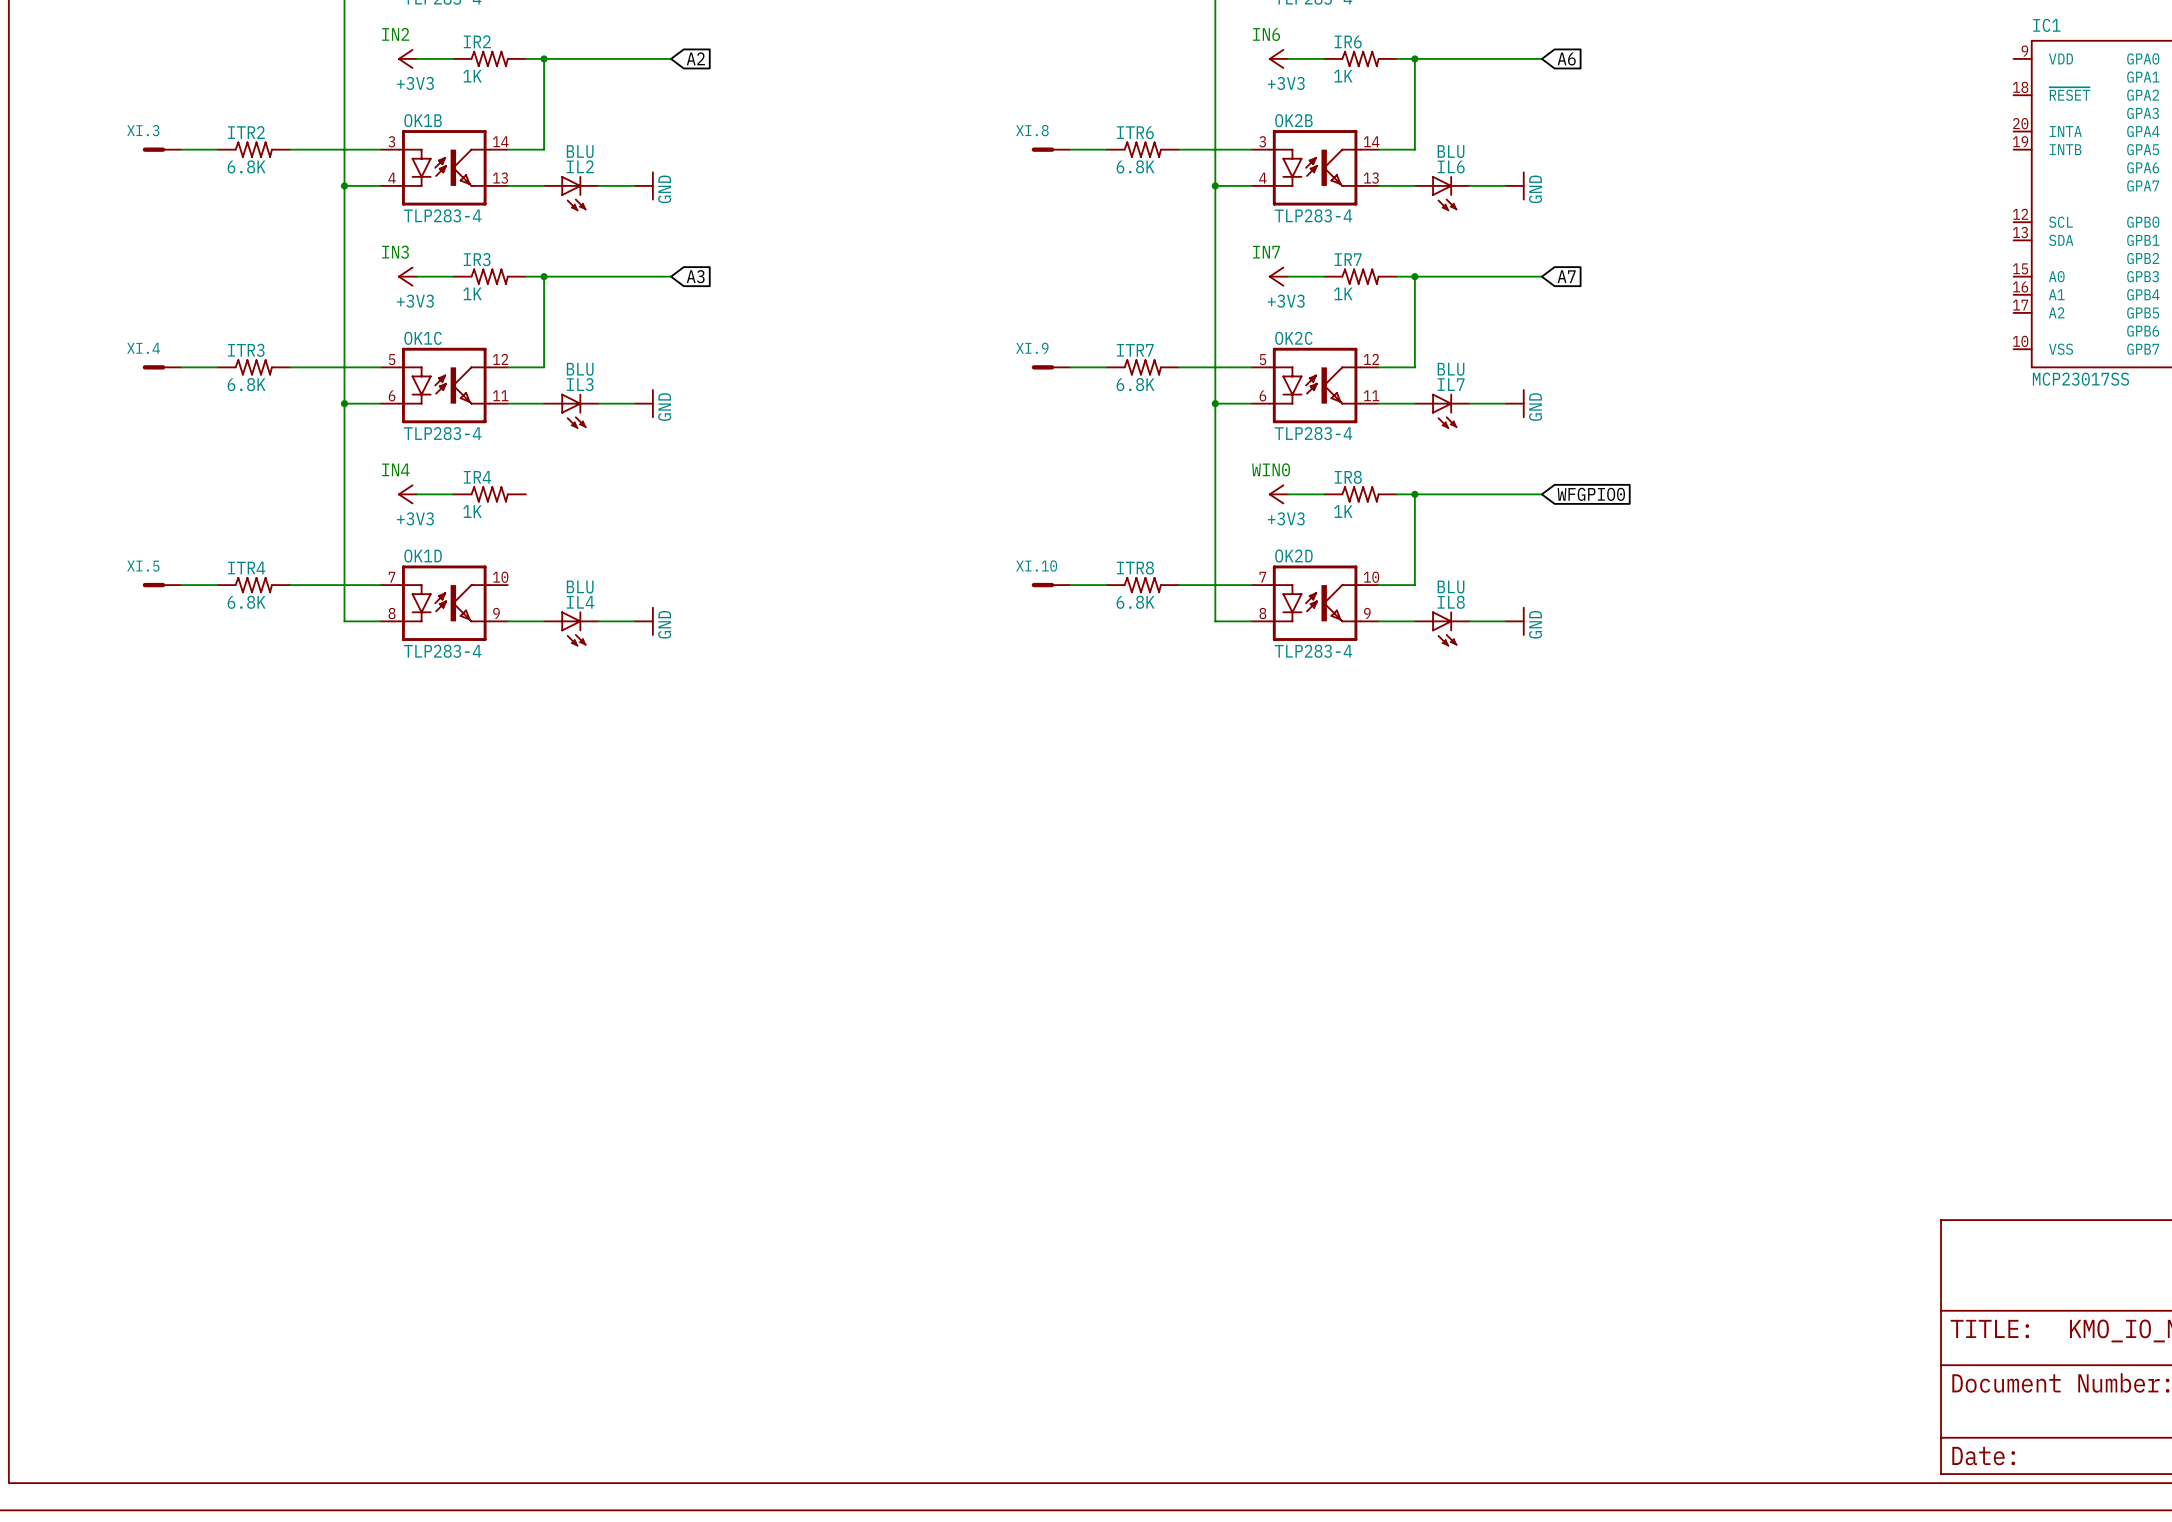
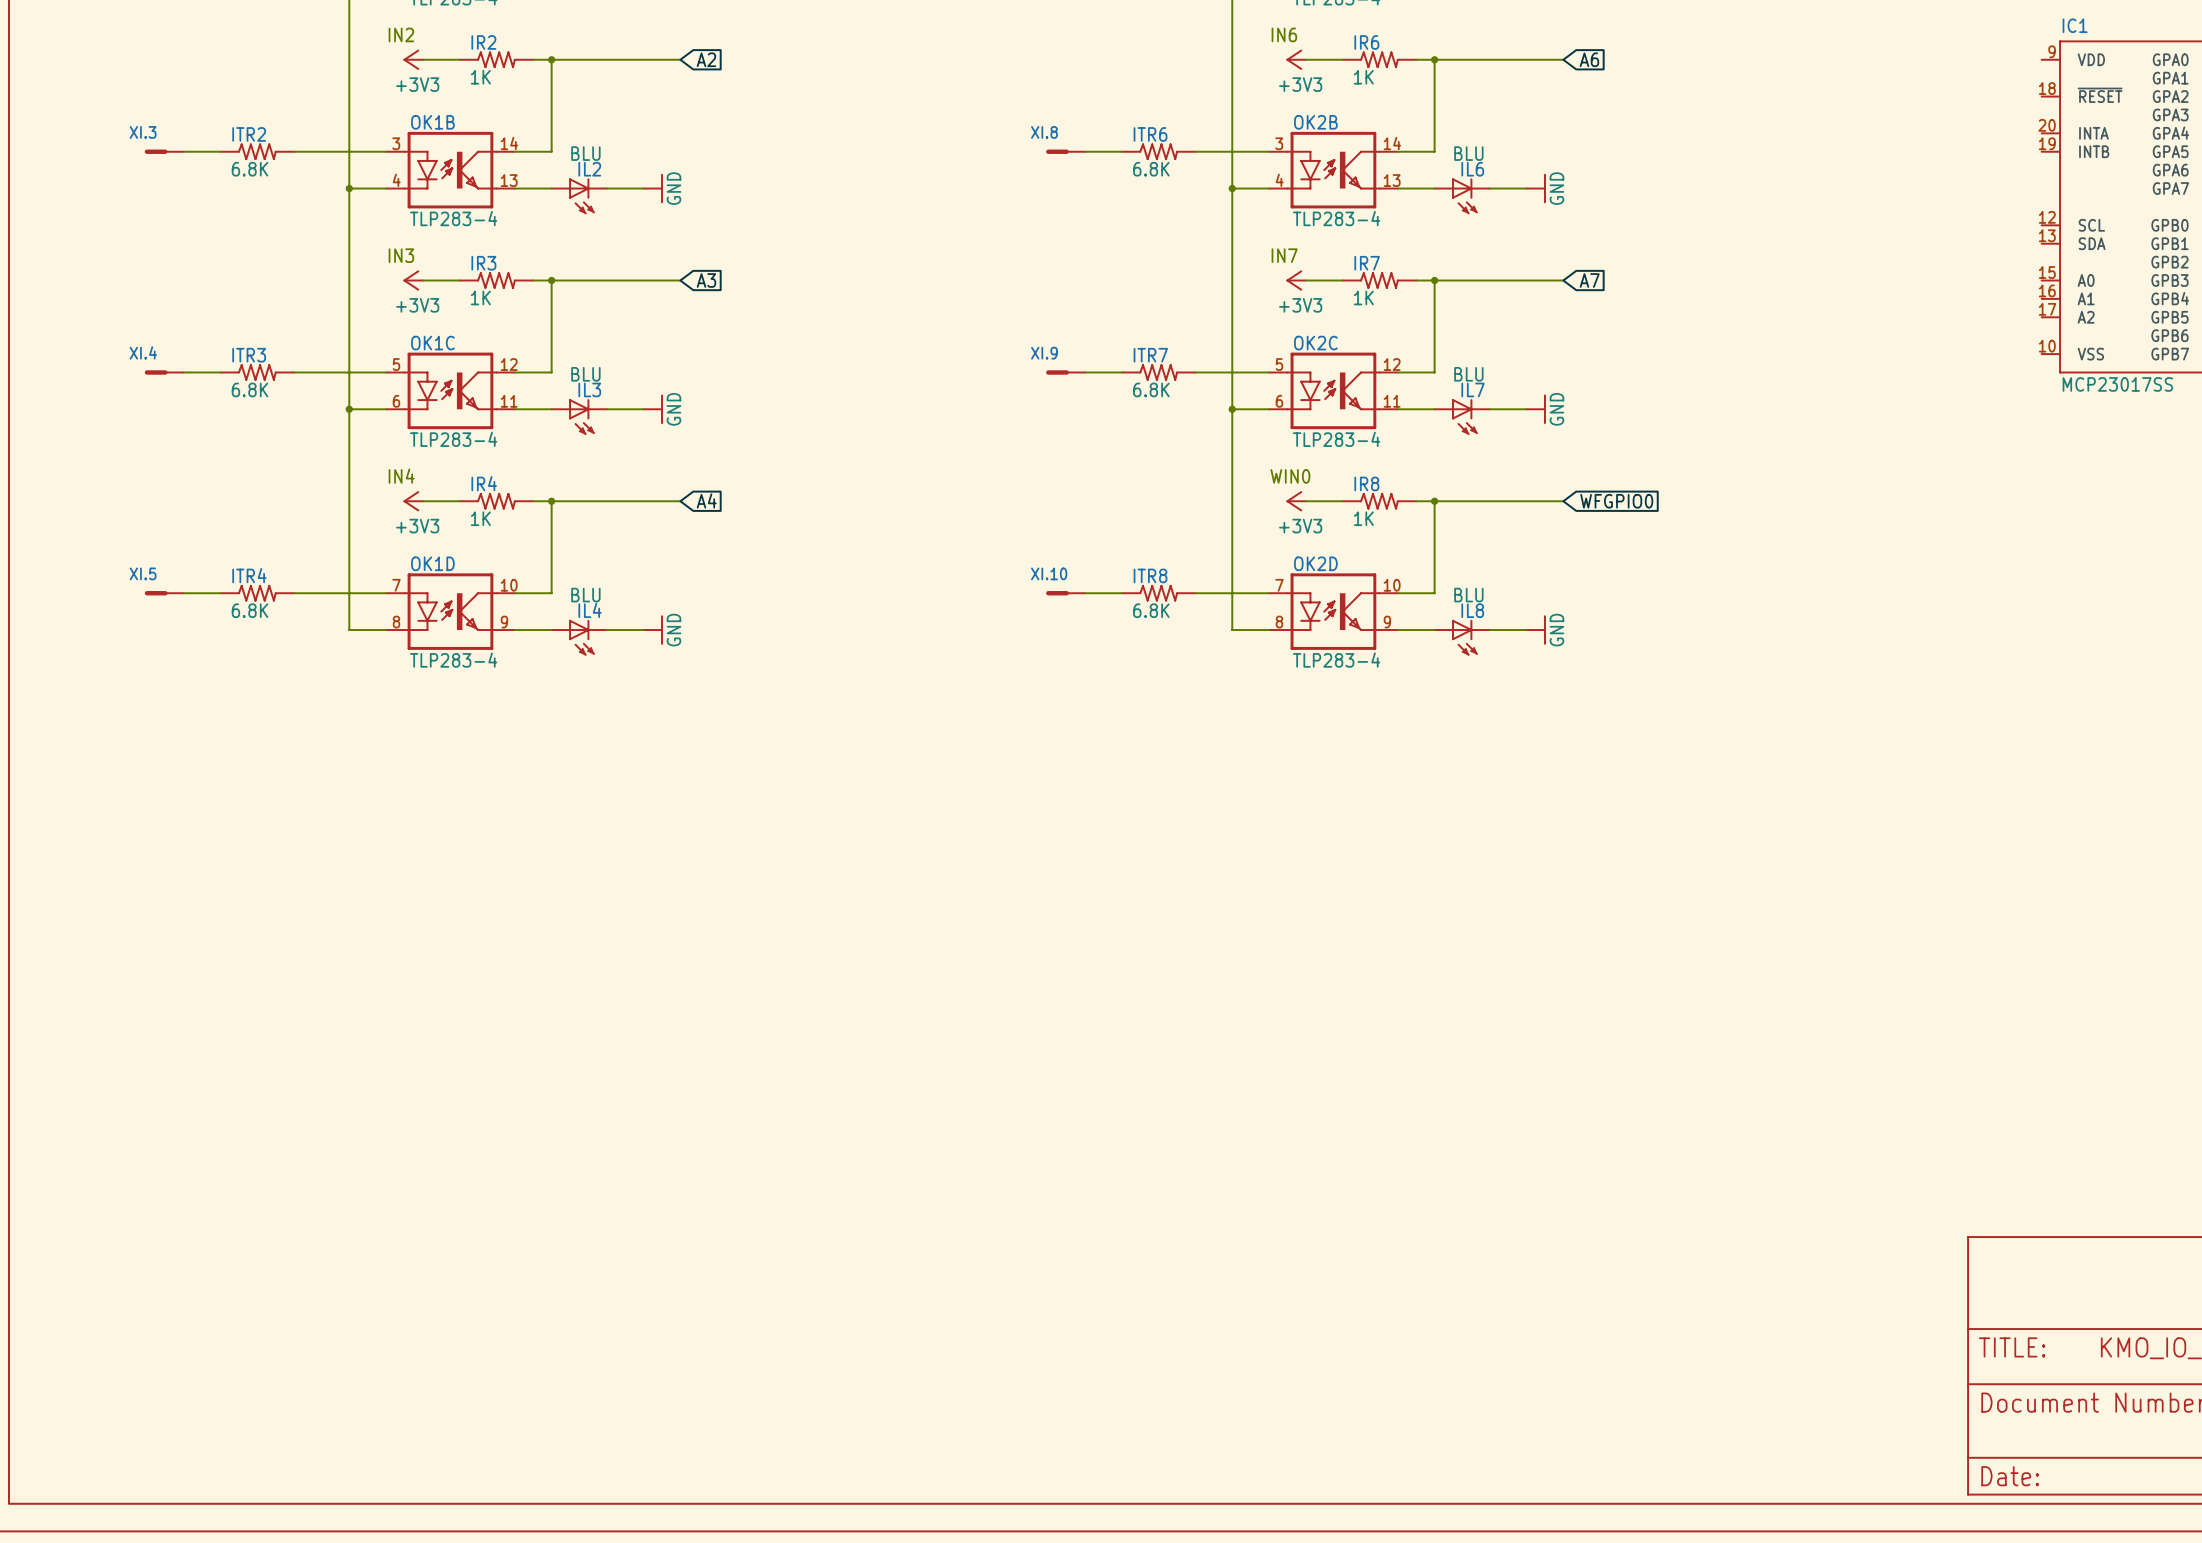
wire: none -> (533, 501) (680, 501)
wire: none -> (551, 501) (551, 593) (514, 593)
junction: none -> (551, 501)
global label: none -> A4 (706, 500)

